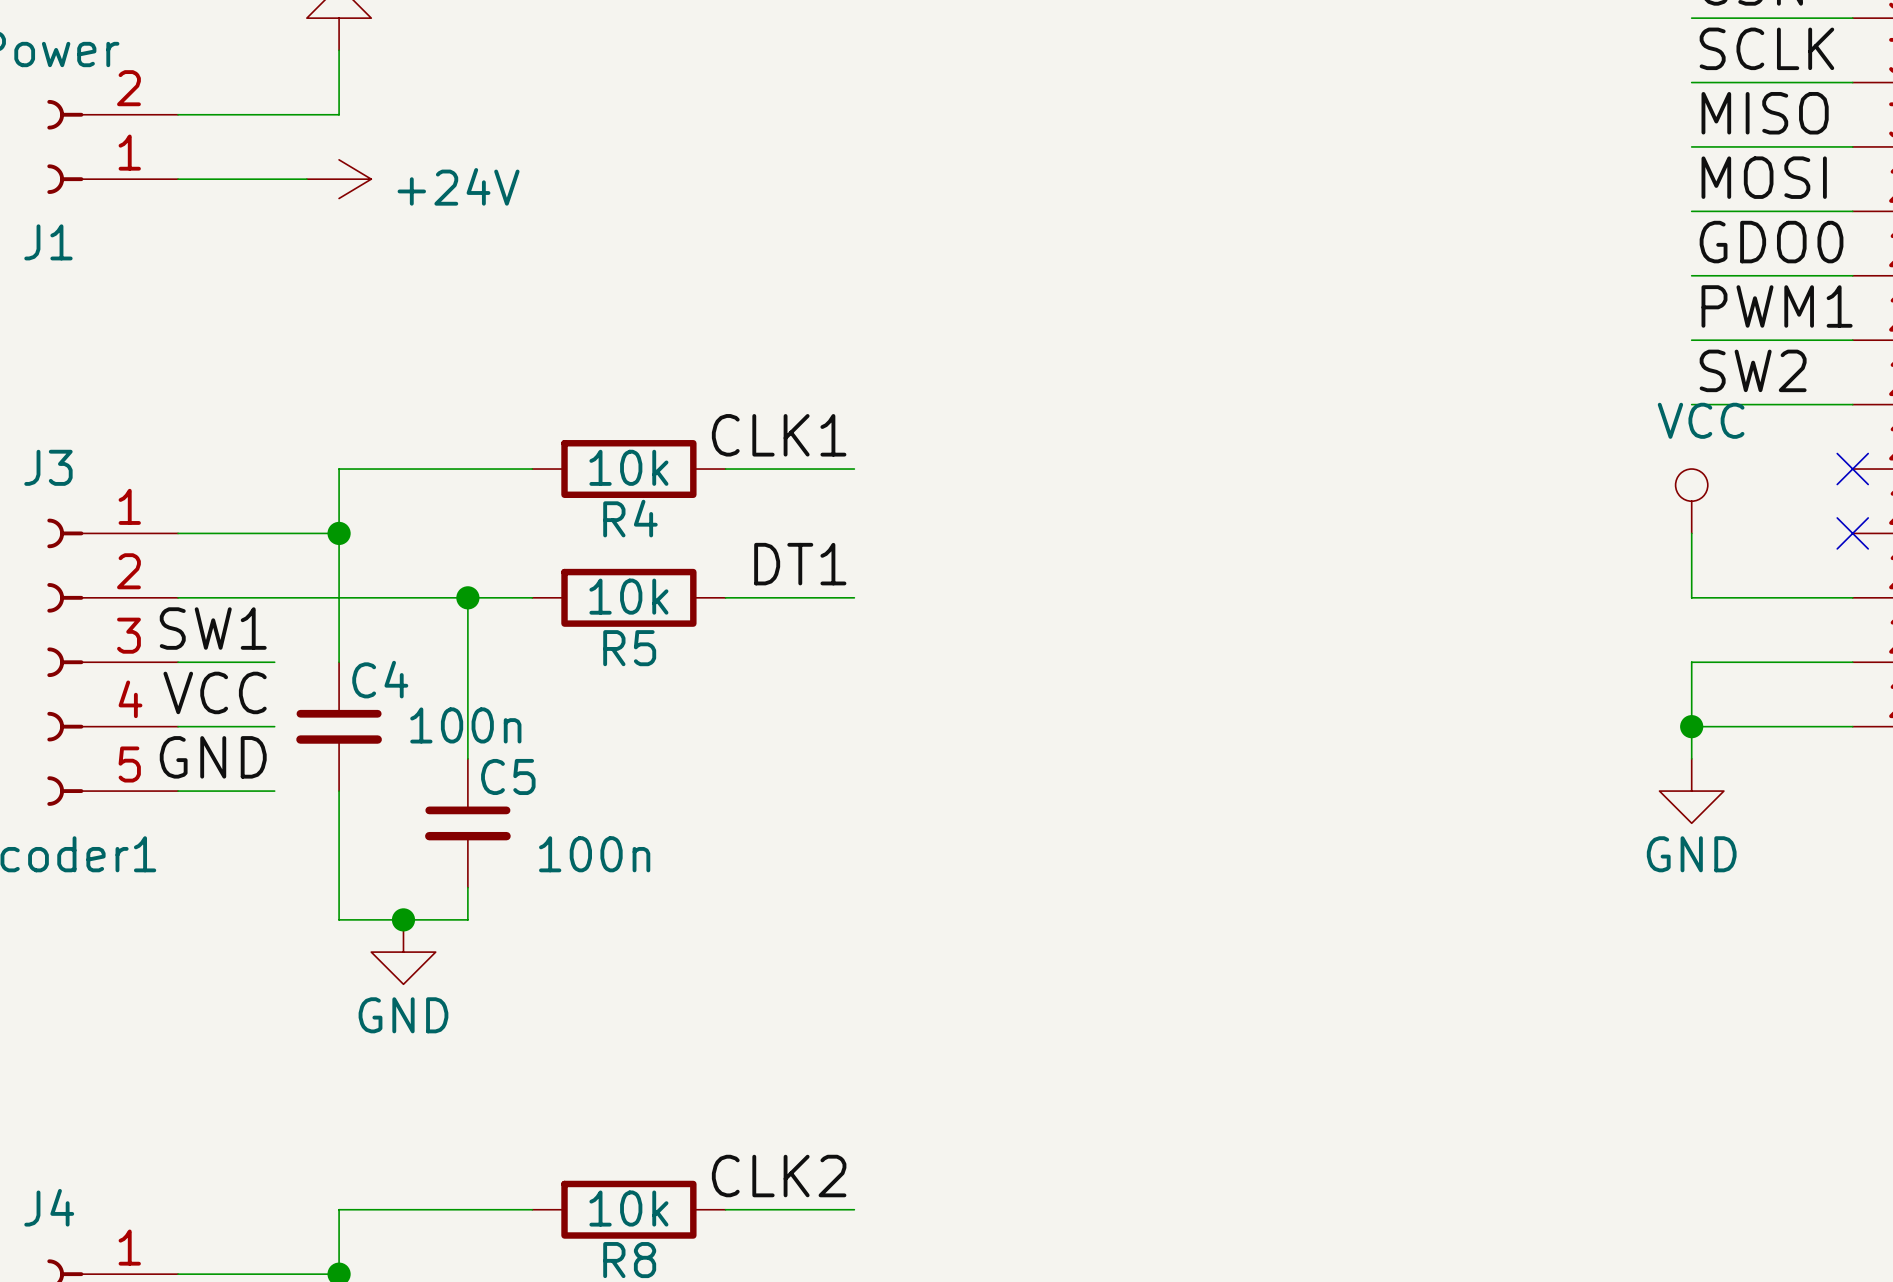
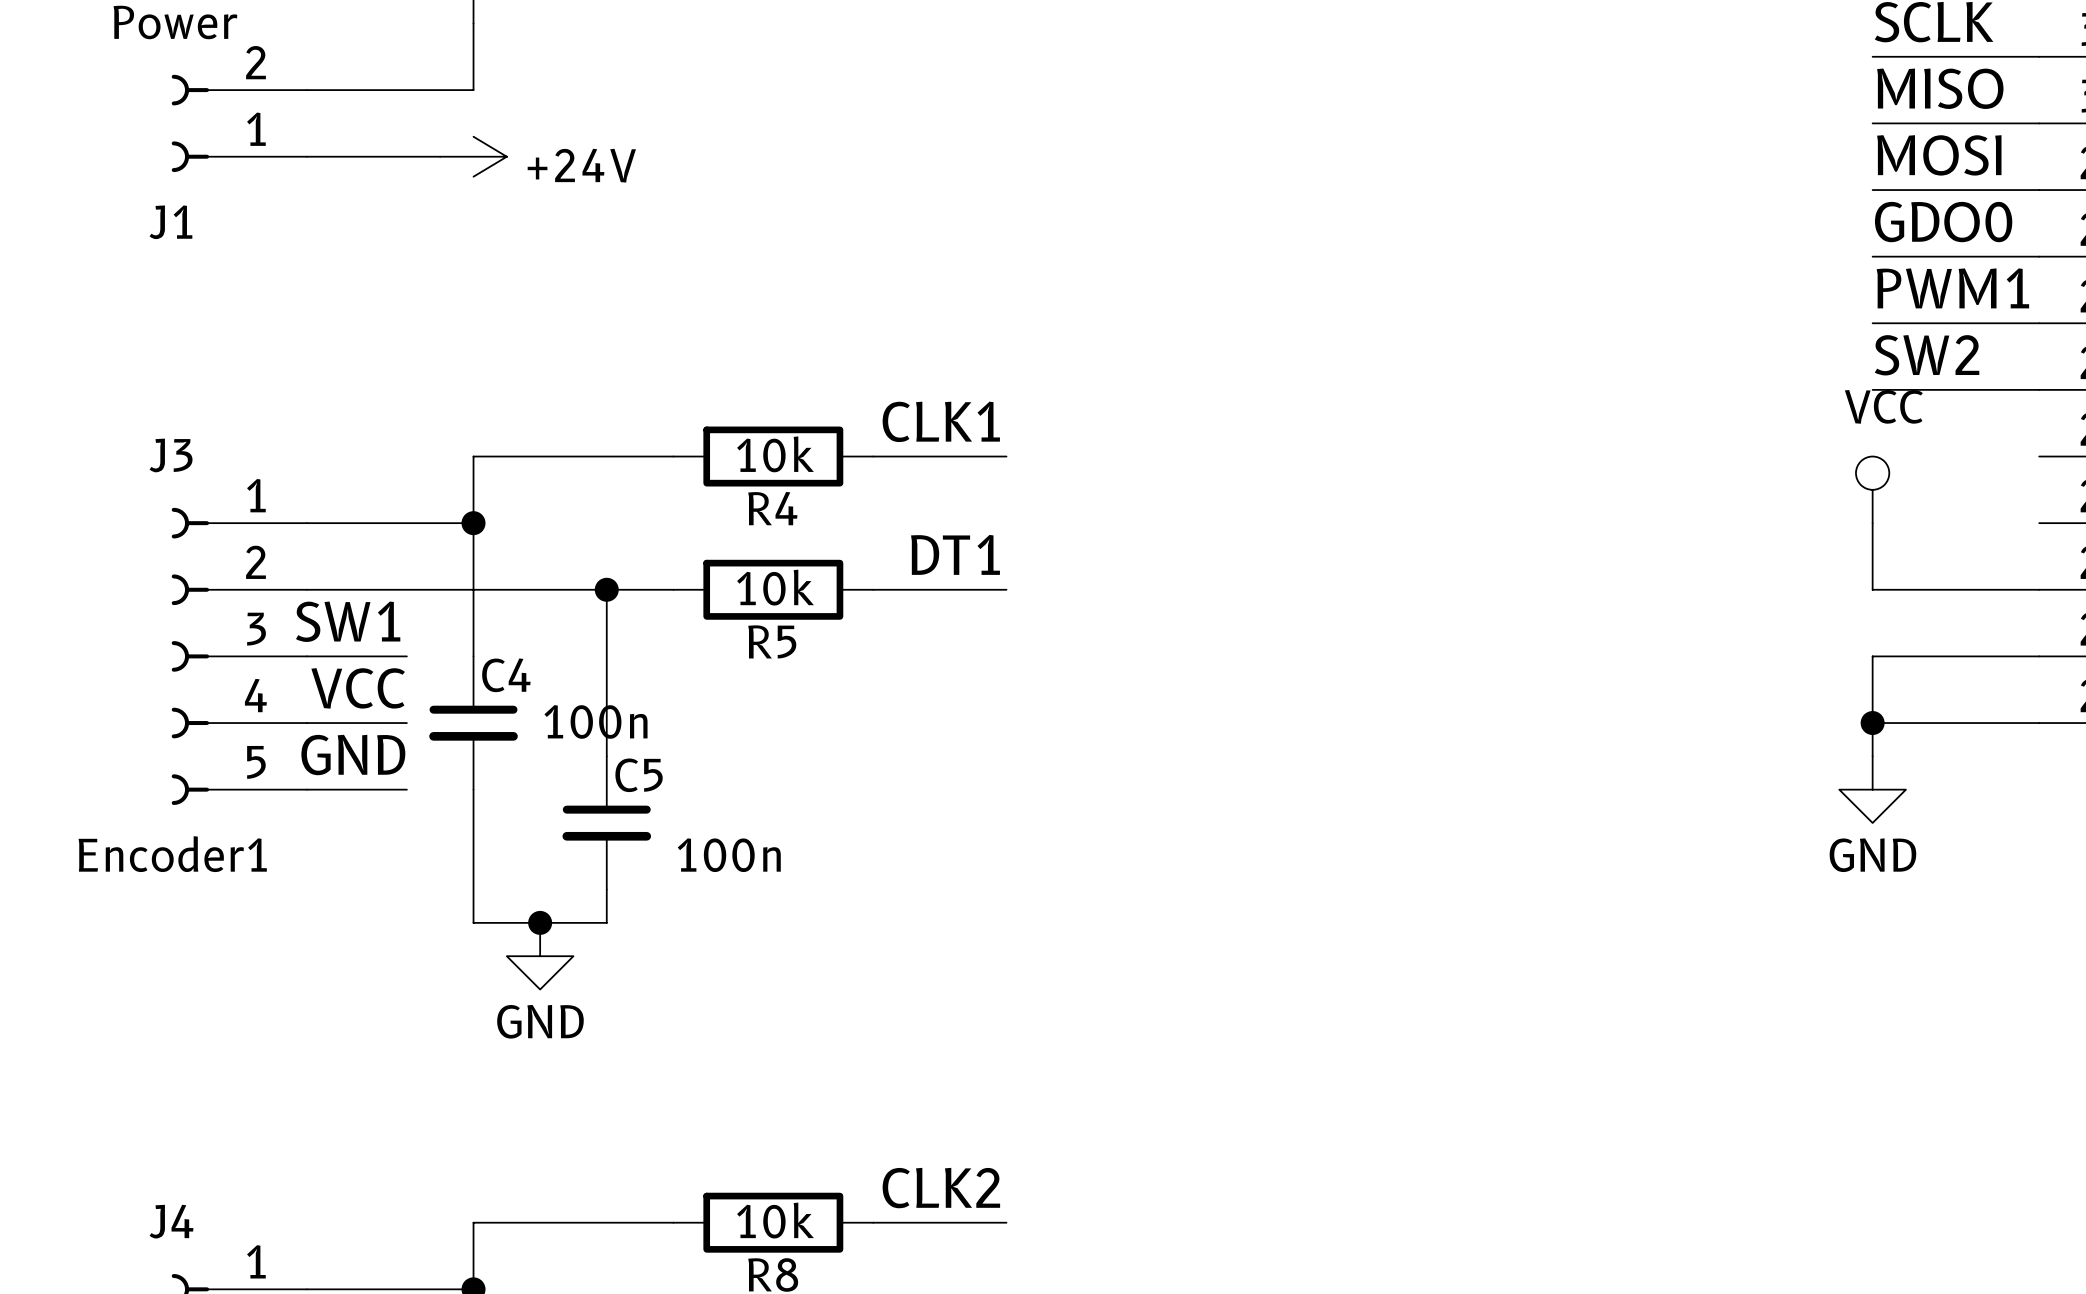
no-connect mark: (1852, 469) -> none
no-connect mark: (1852, 533) -> none

